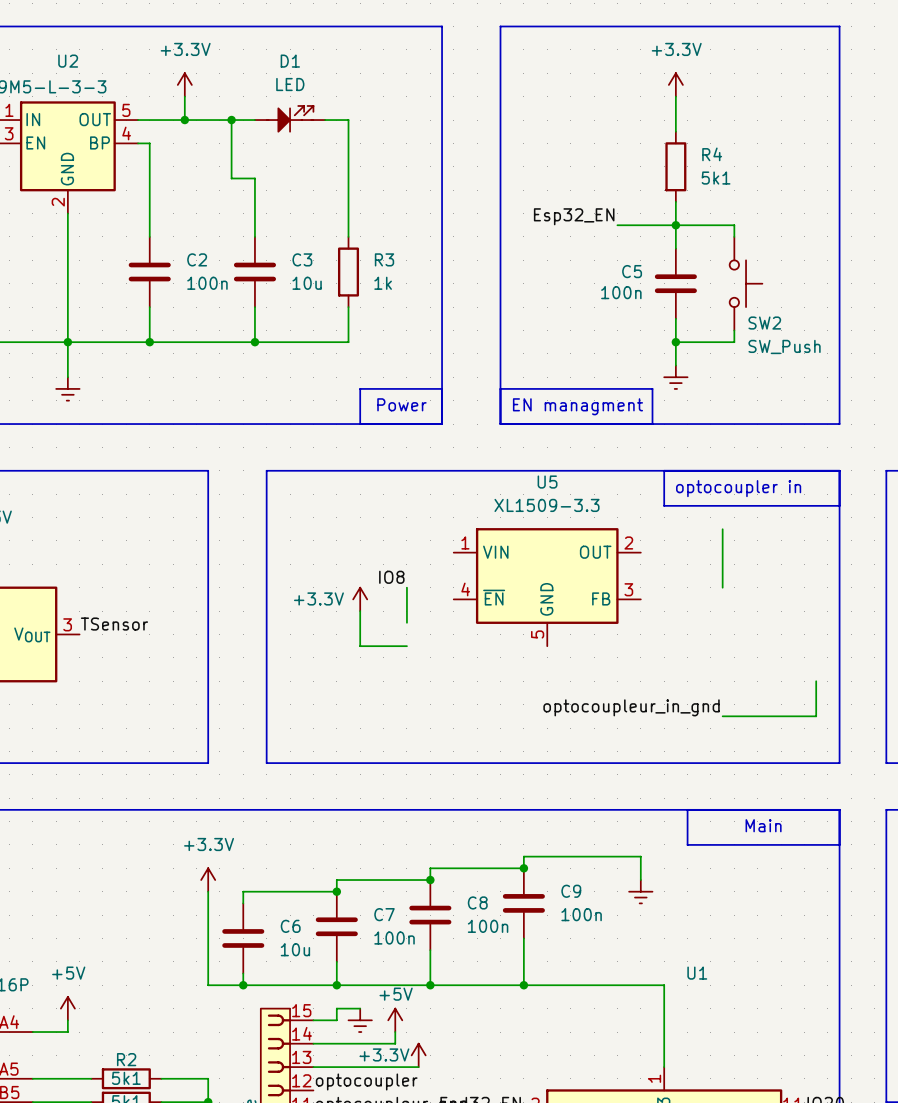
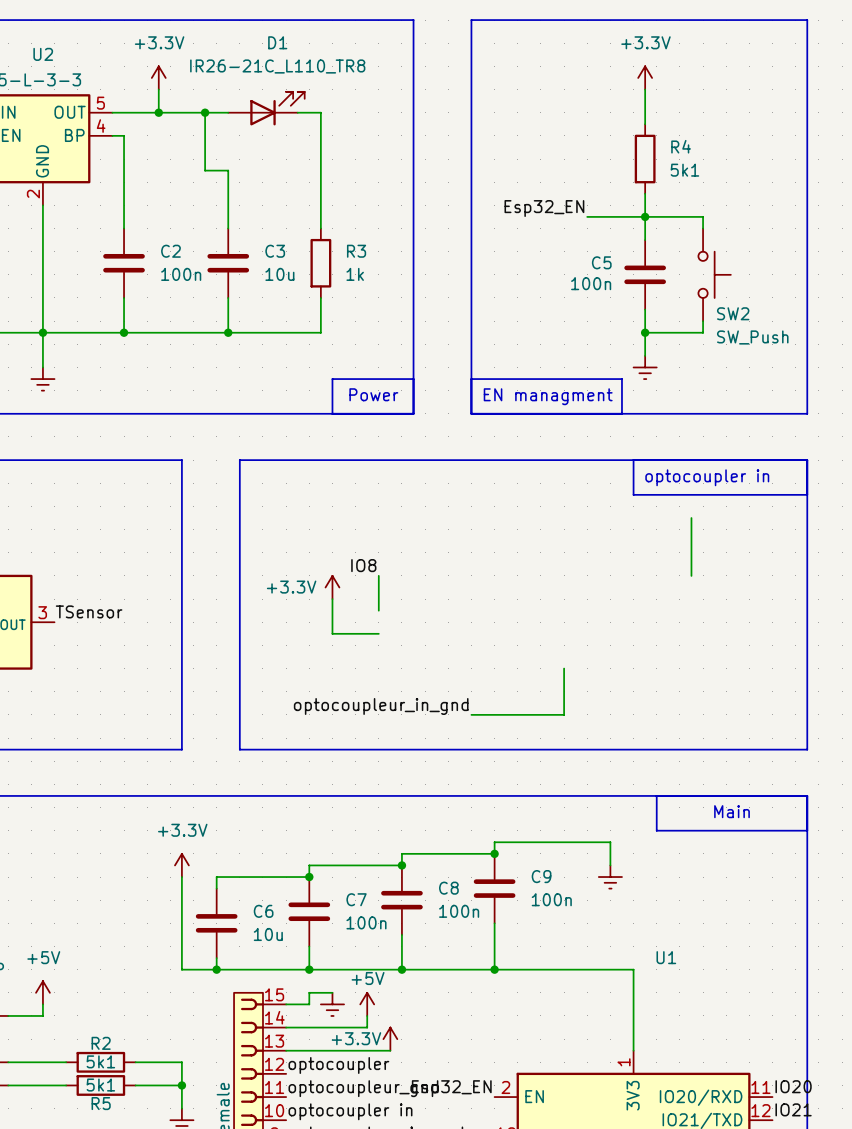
D1 value: LED (290, 84) -> IR26-21C_L110_TR8 (277, 66)
D1 symbol: [254, 105, 326, 132] -> [228, 91, 305, 126]
U5: XL1509-3.3 (547, 587) -> none
wire: none -> (564, 668) (564, 714) (471, 714)
wire: (816, 681) (816, 716) (722, 716) -> none
label position: optocoupleur_in_gnd (631, 707) -> optocoupleur_in_gnd (381, 706)

